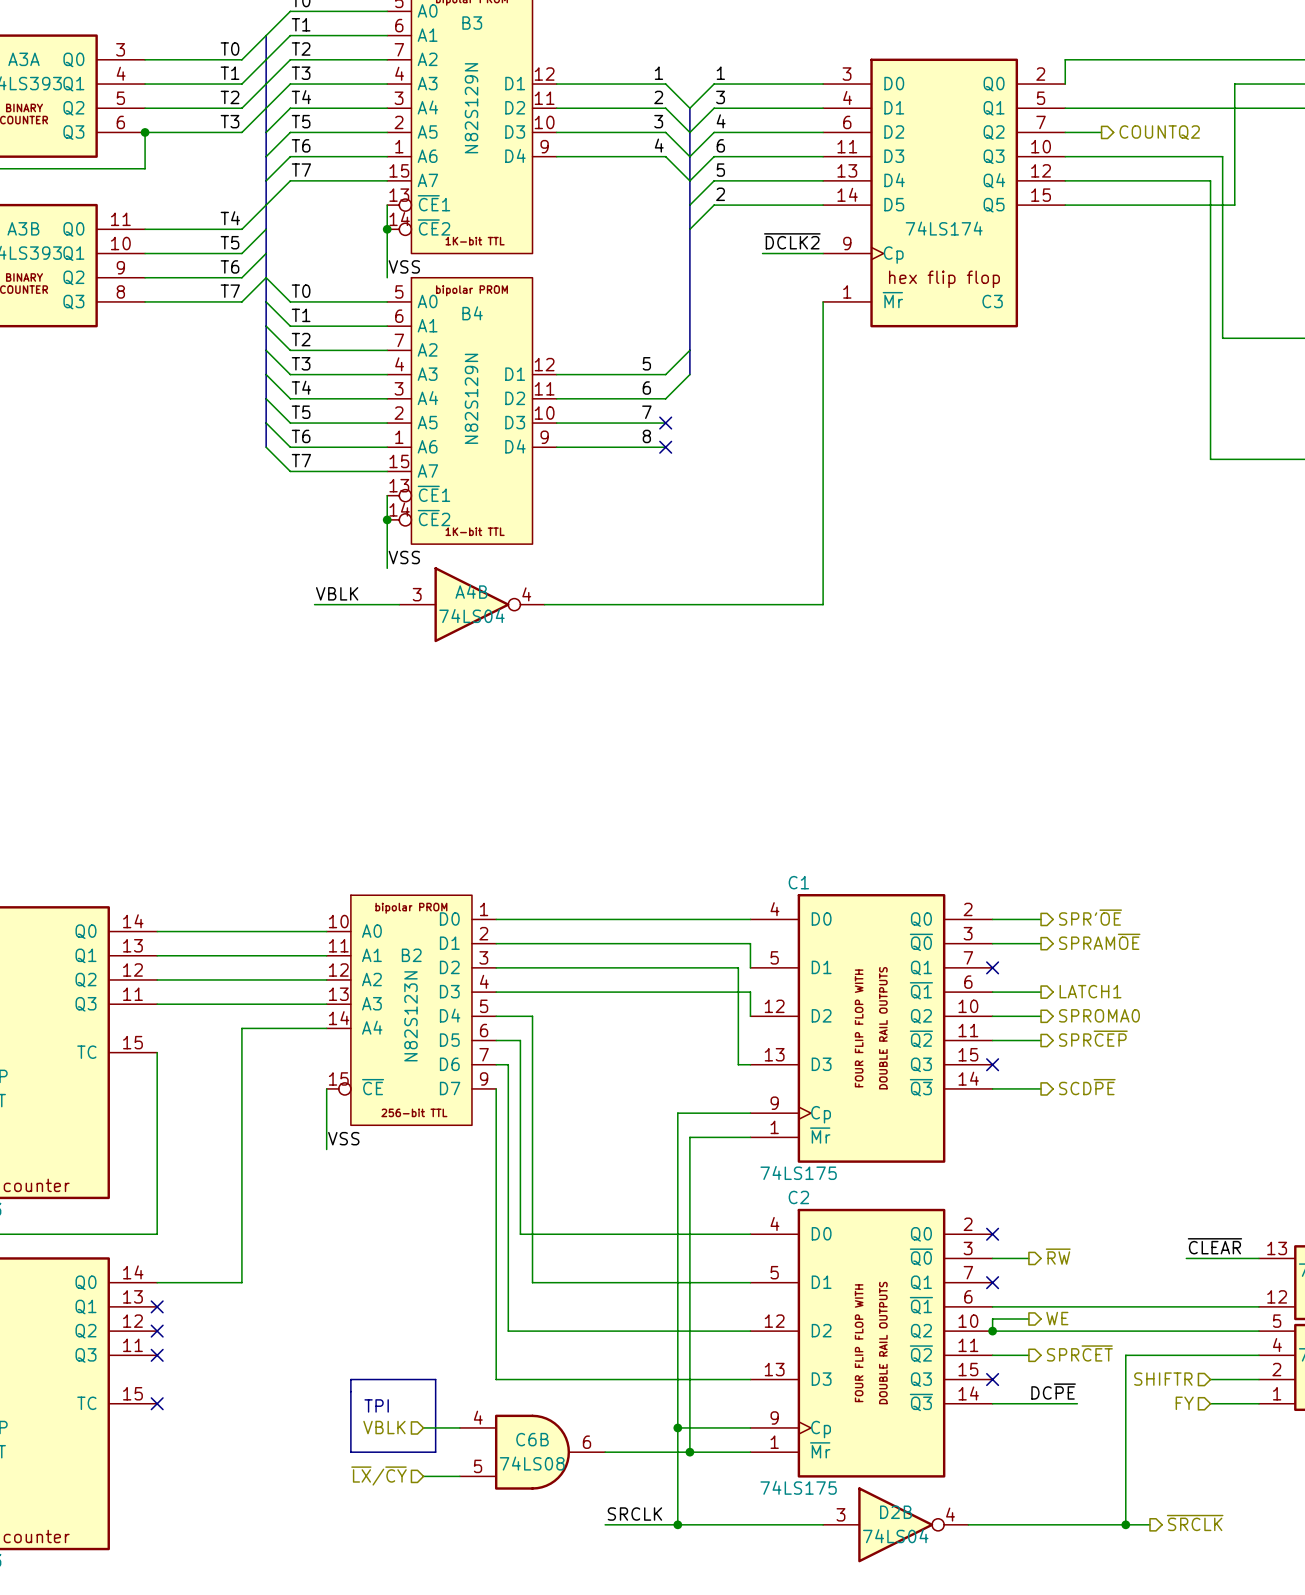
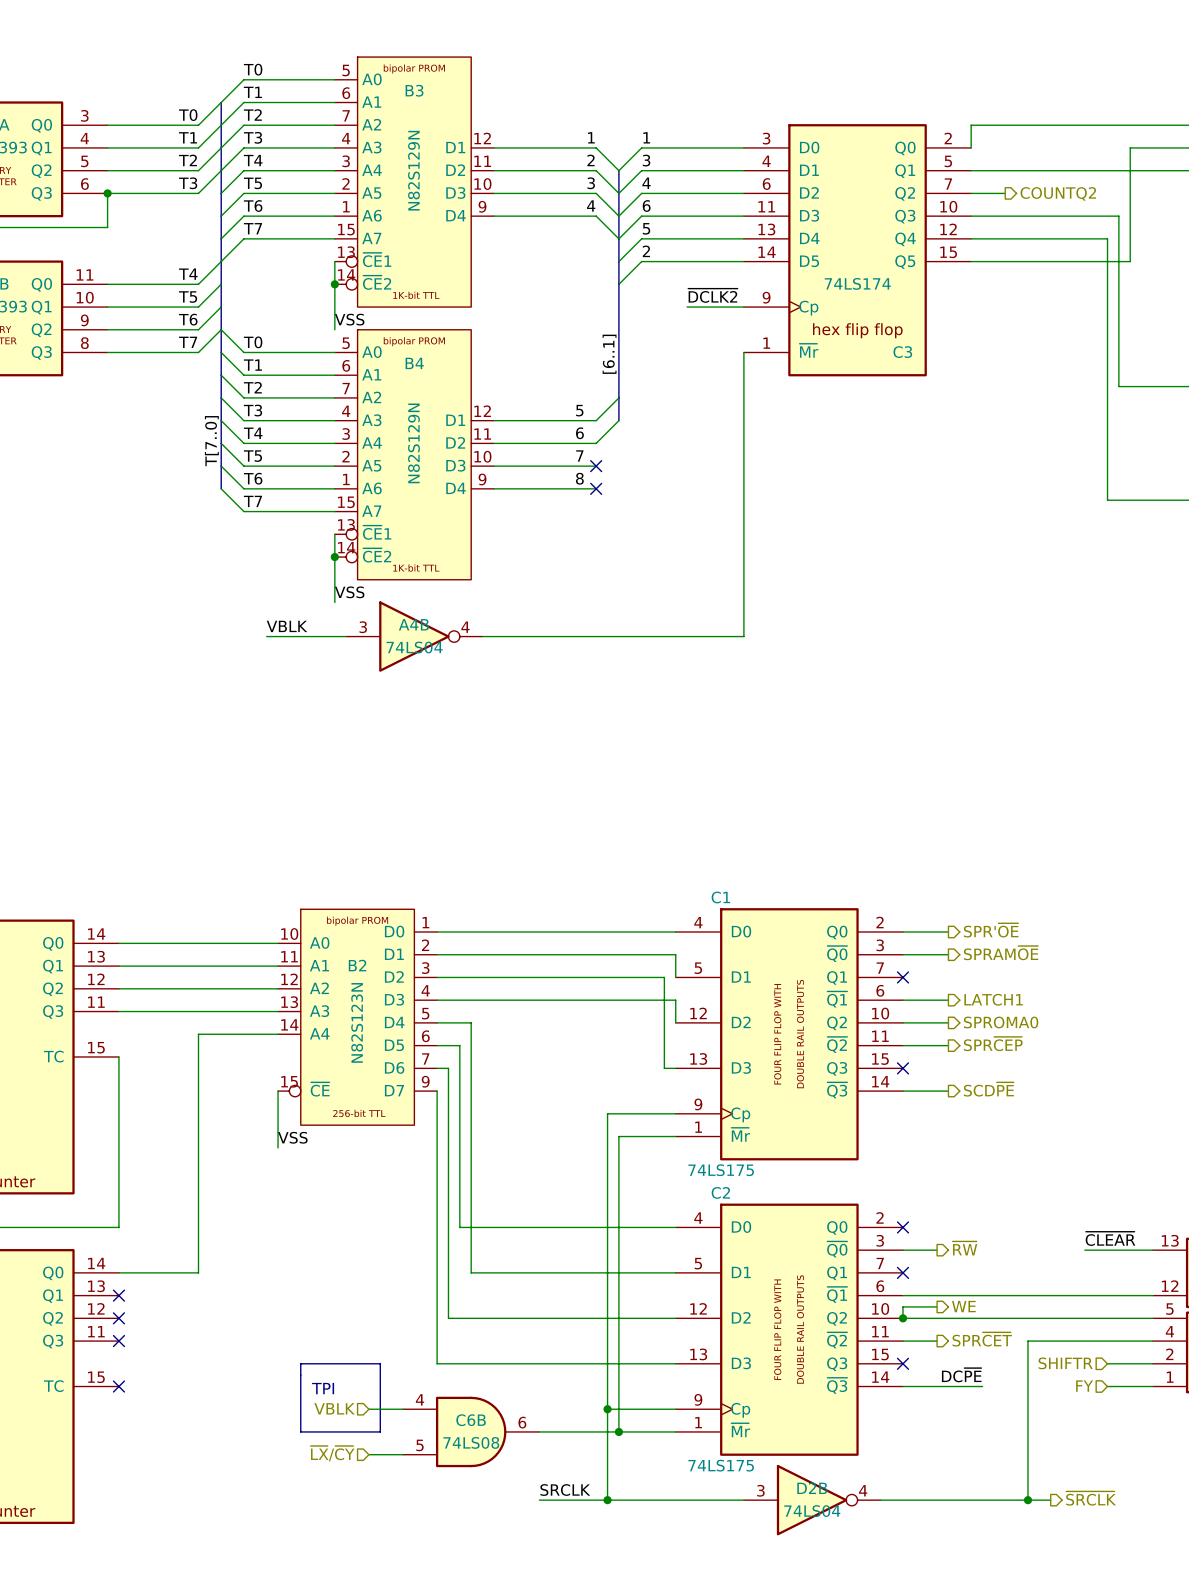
label: none -> [6..1] (609, 354)
label: none -> T[7..0] (211, 441)

